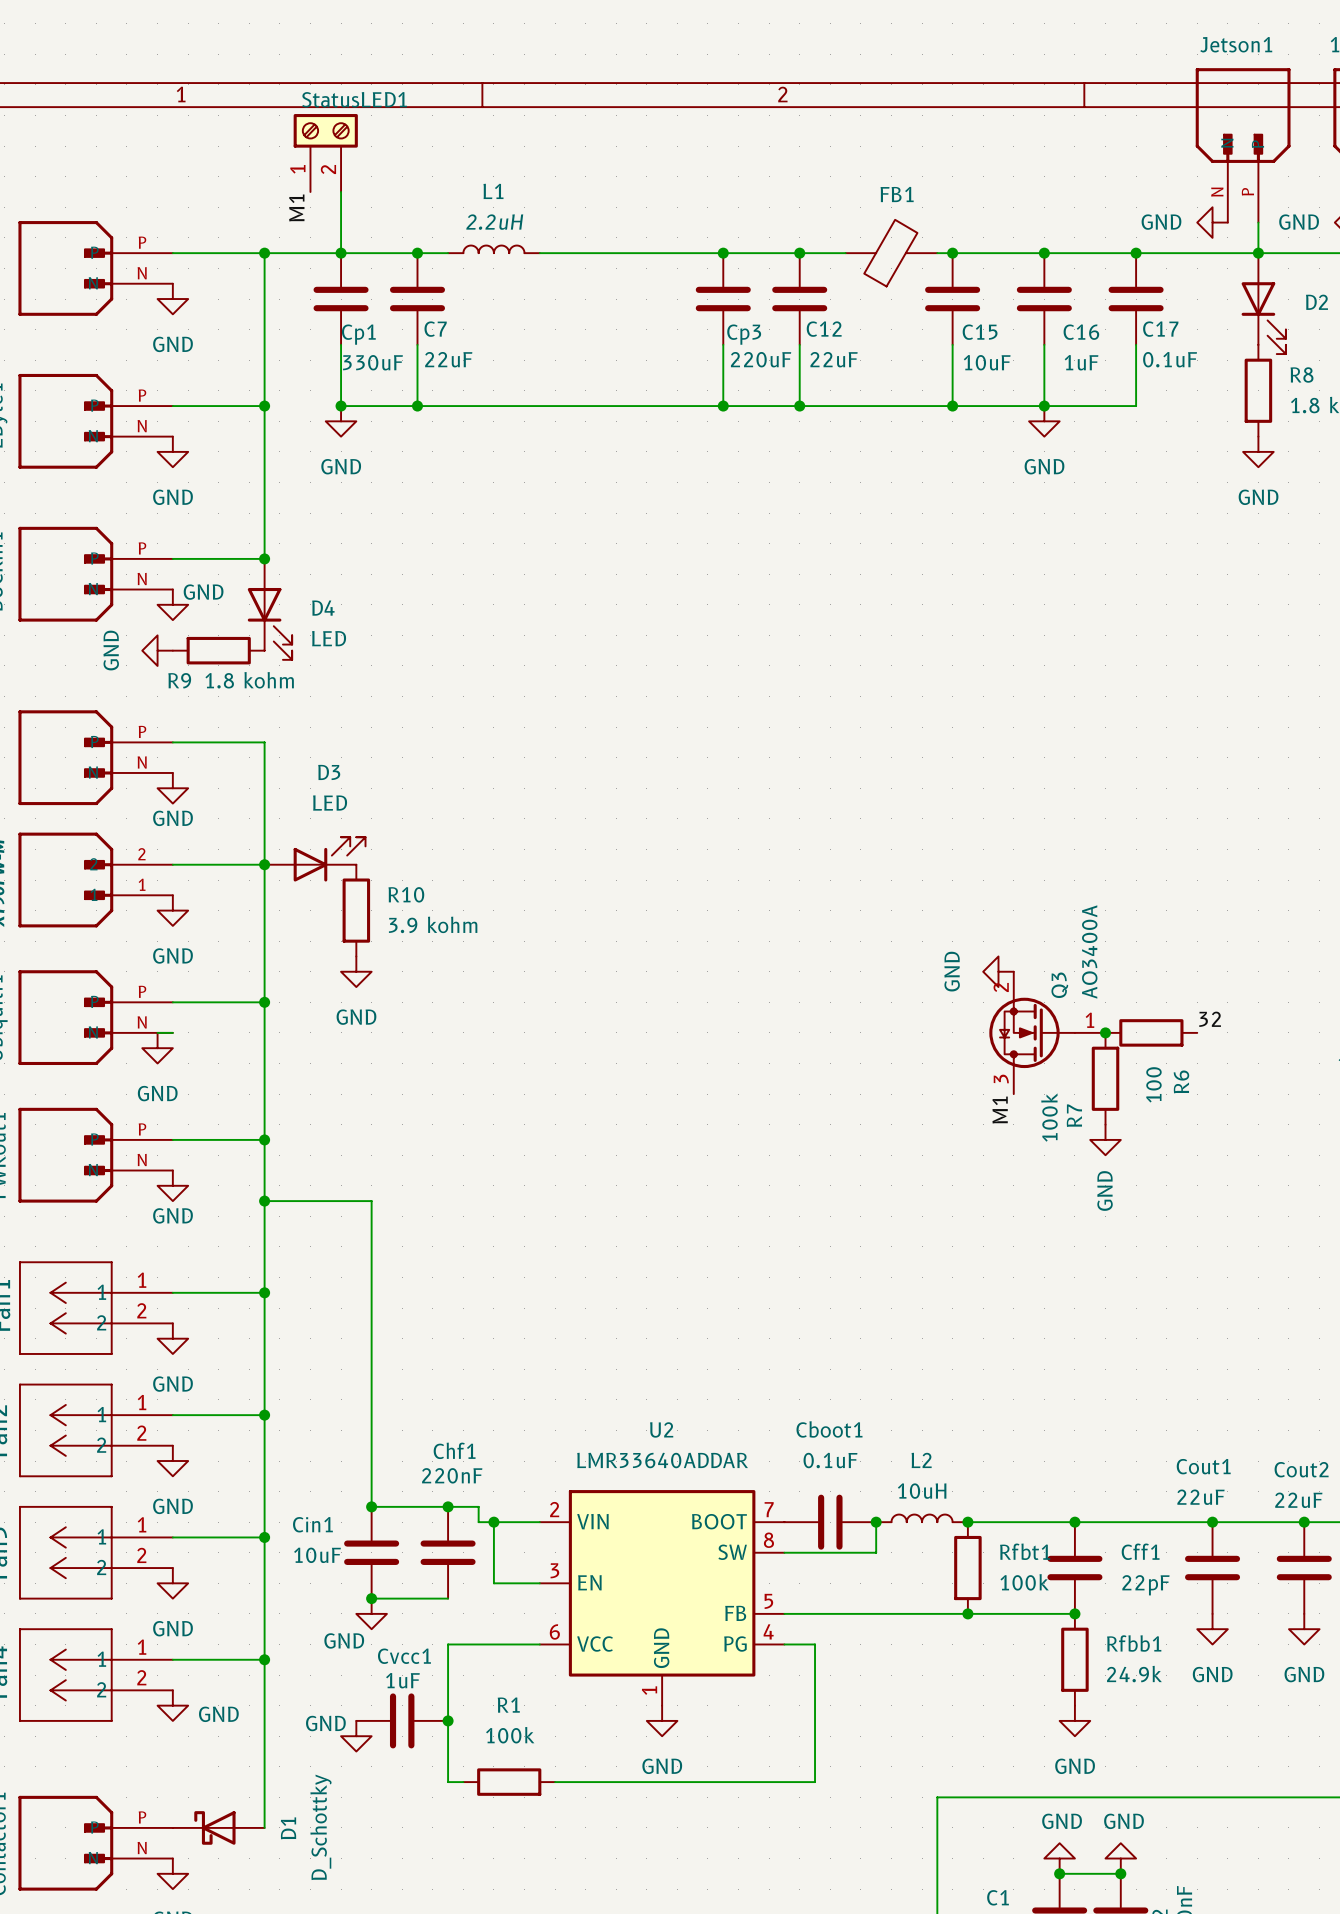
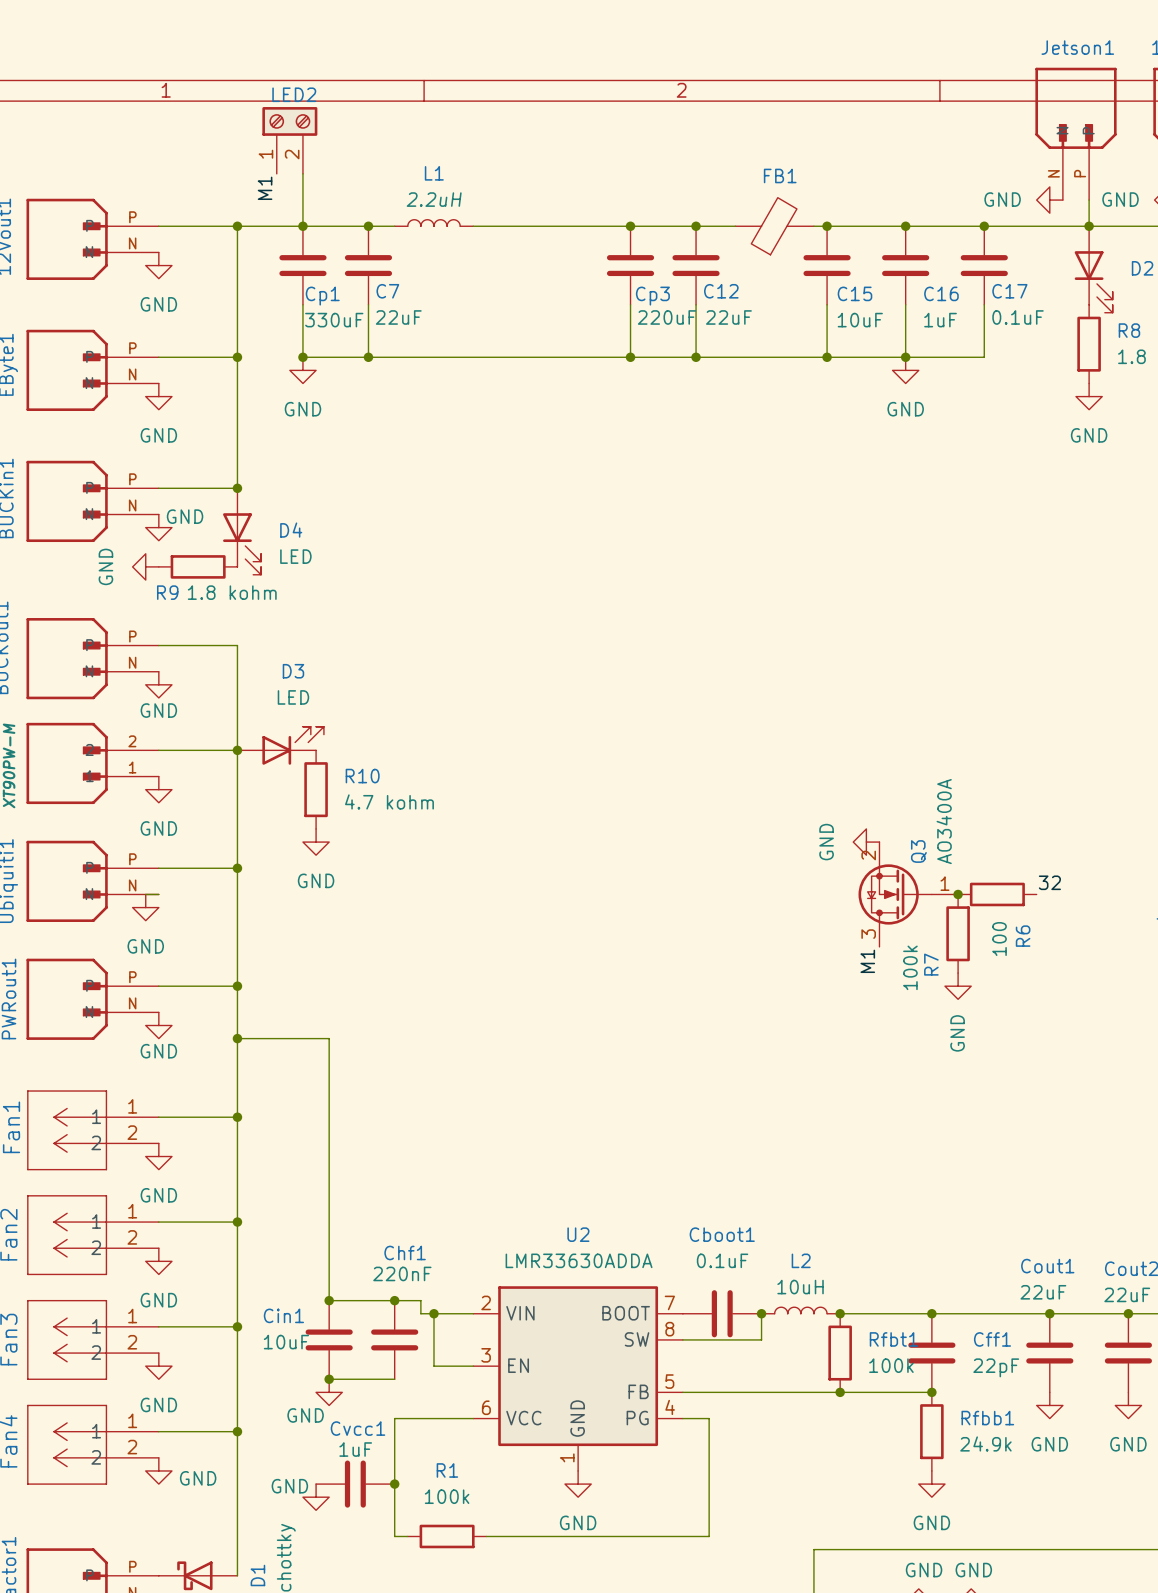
StatusLED1 name: StatusLED1 (354, 99) -> LED2 (294, 94)
R10 value: 3.9 kohm (433, 924) -> 4.7 kohm (389, 801)
U2 value: LMR33640ADDAR (662, 1460) -> LMR33630ADDA (579, 1260)

